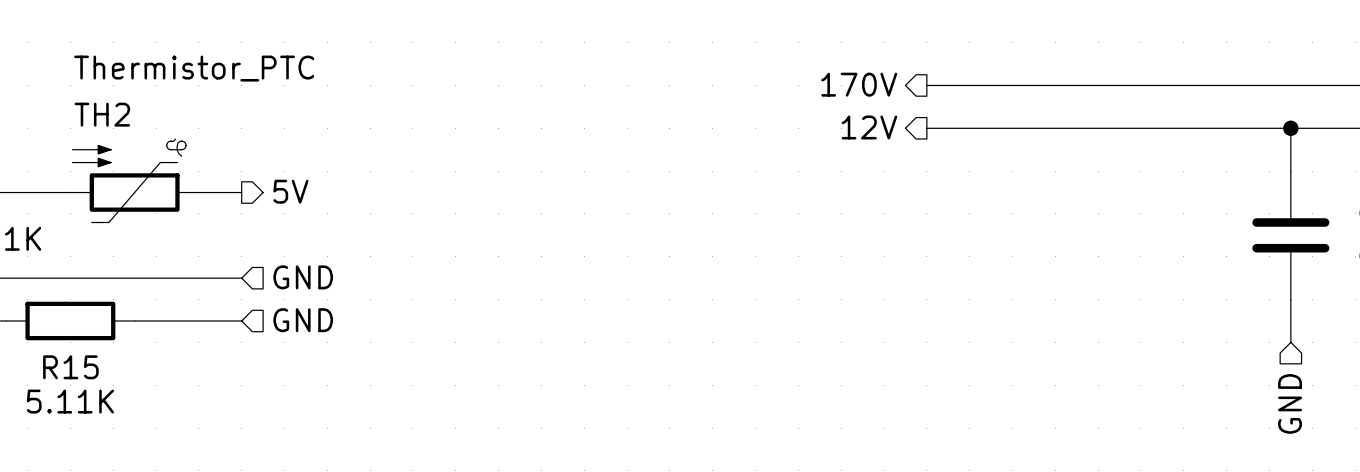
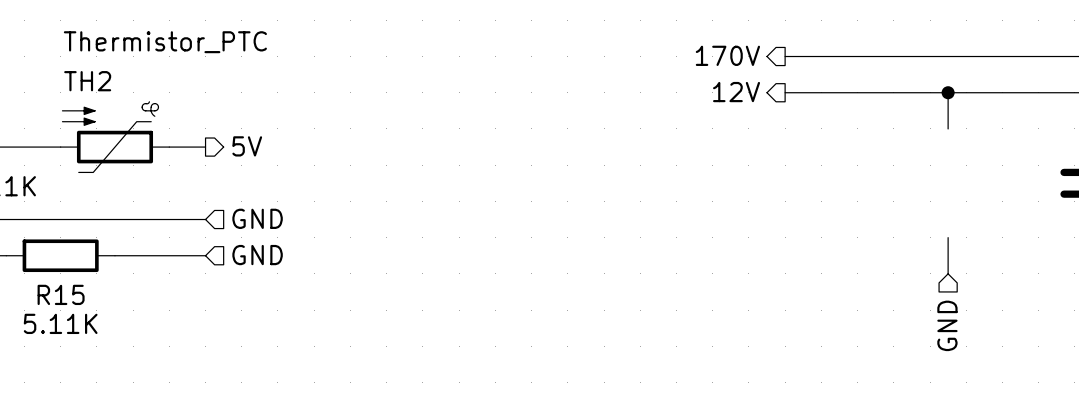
wire: none -> (948, 92) (948, 128)
junction: none -> (948, 92)
wire: none -> (948, 237) (948, 273)
hierarchical label: none -> GND (947, 325)

